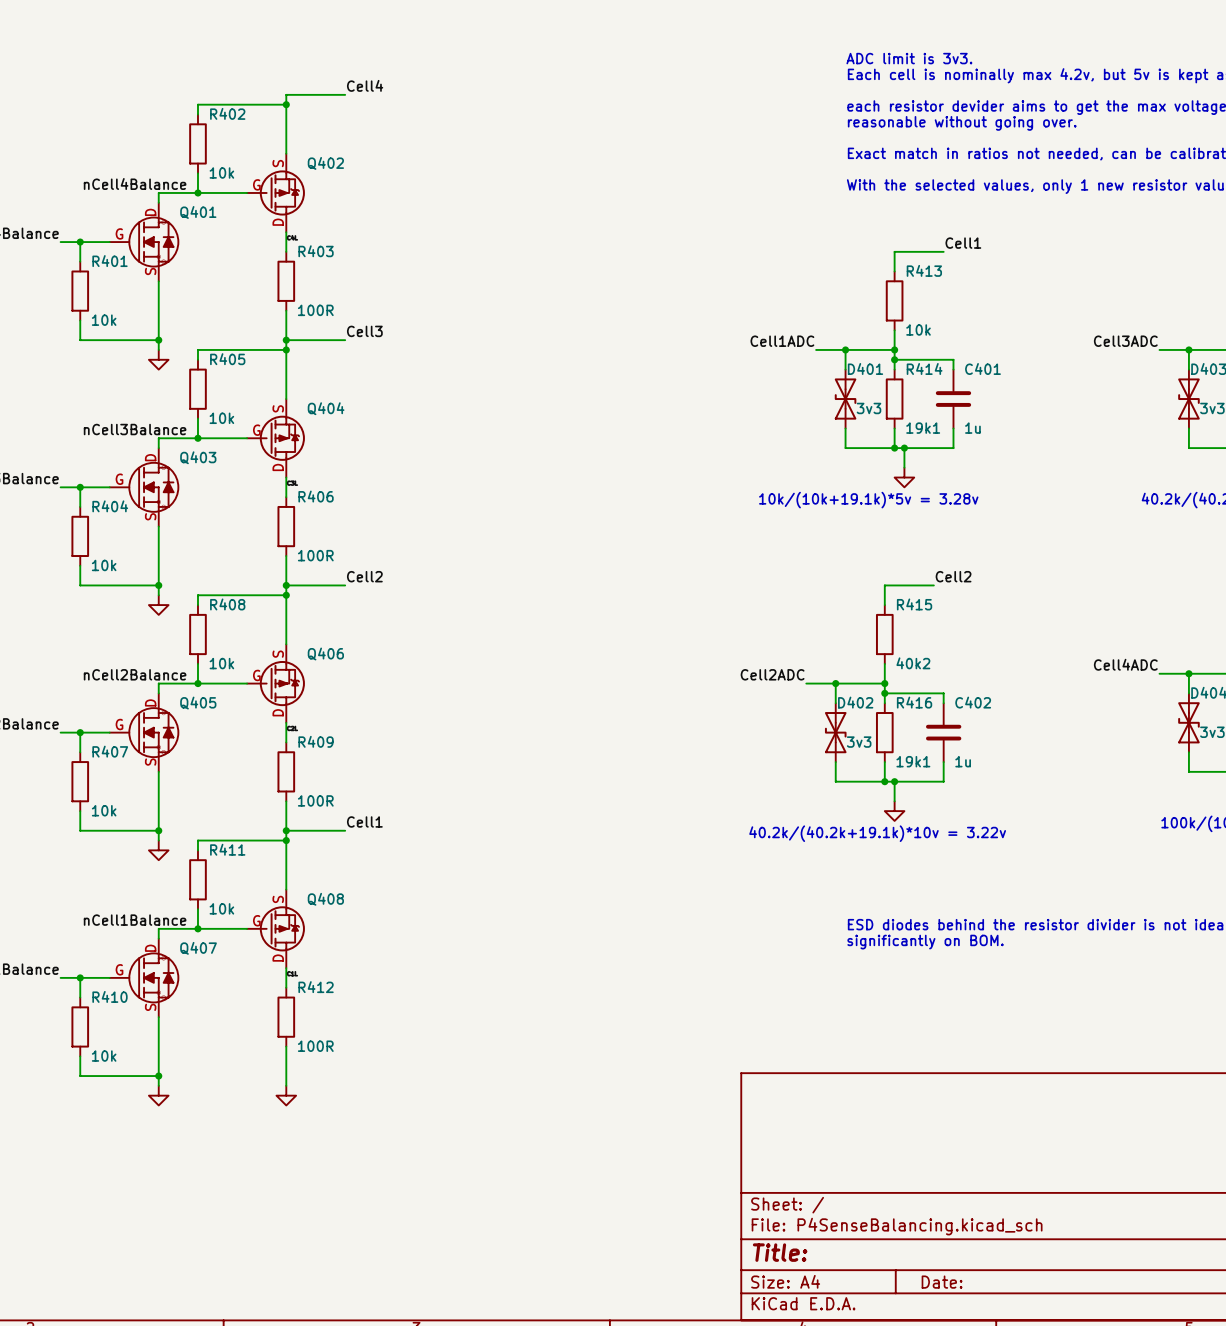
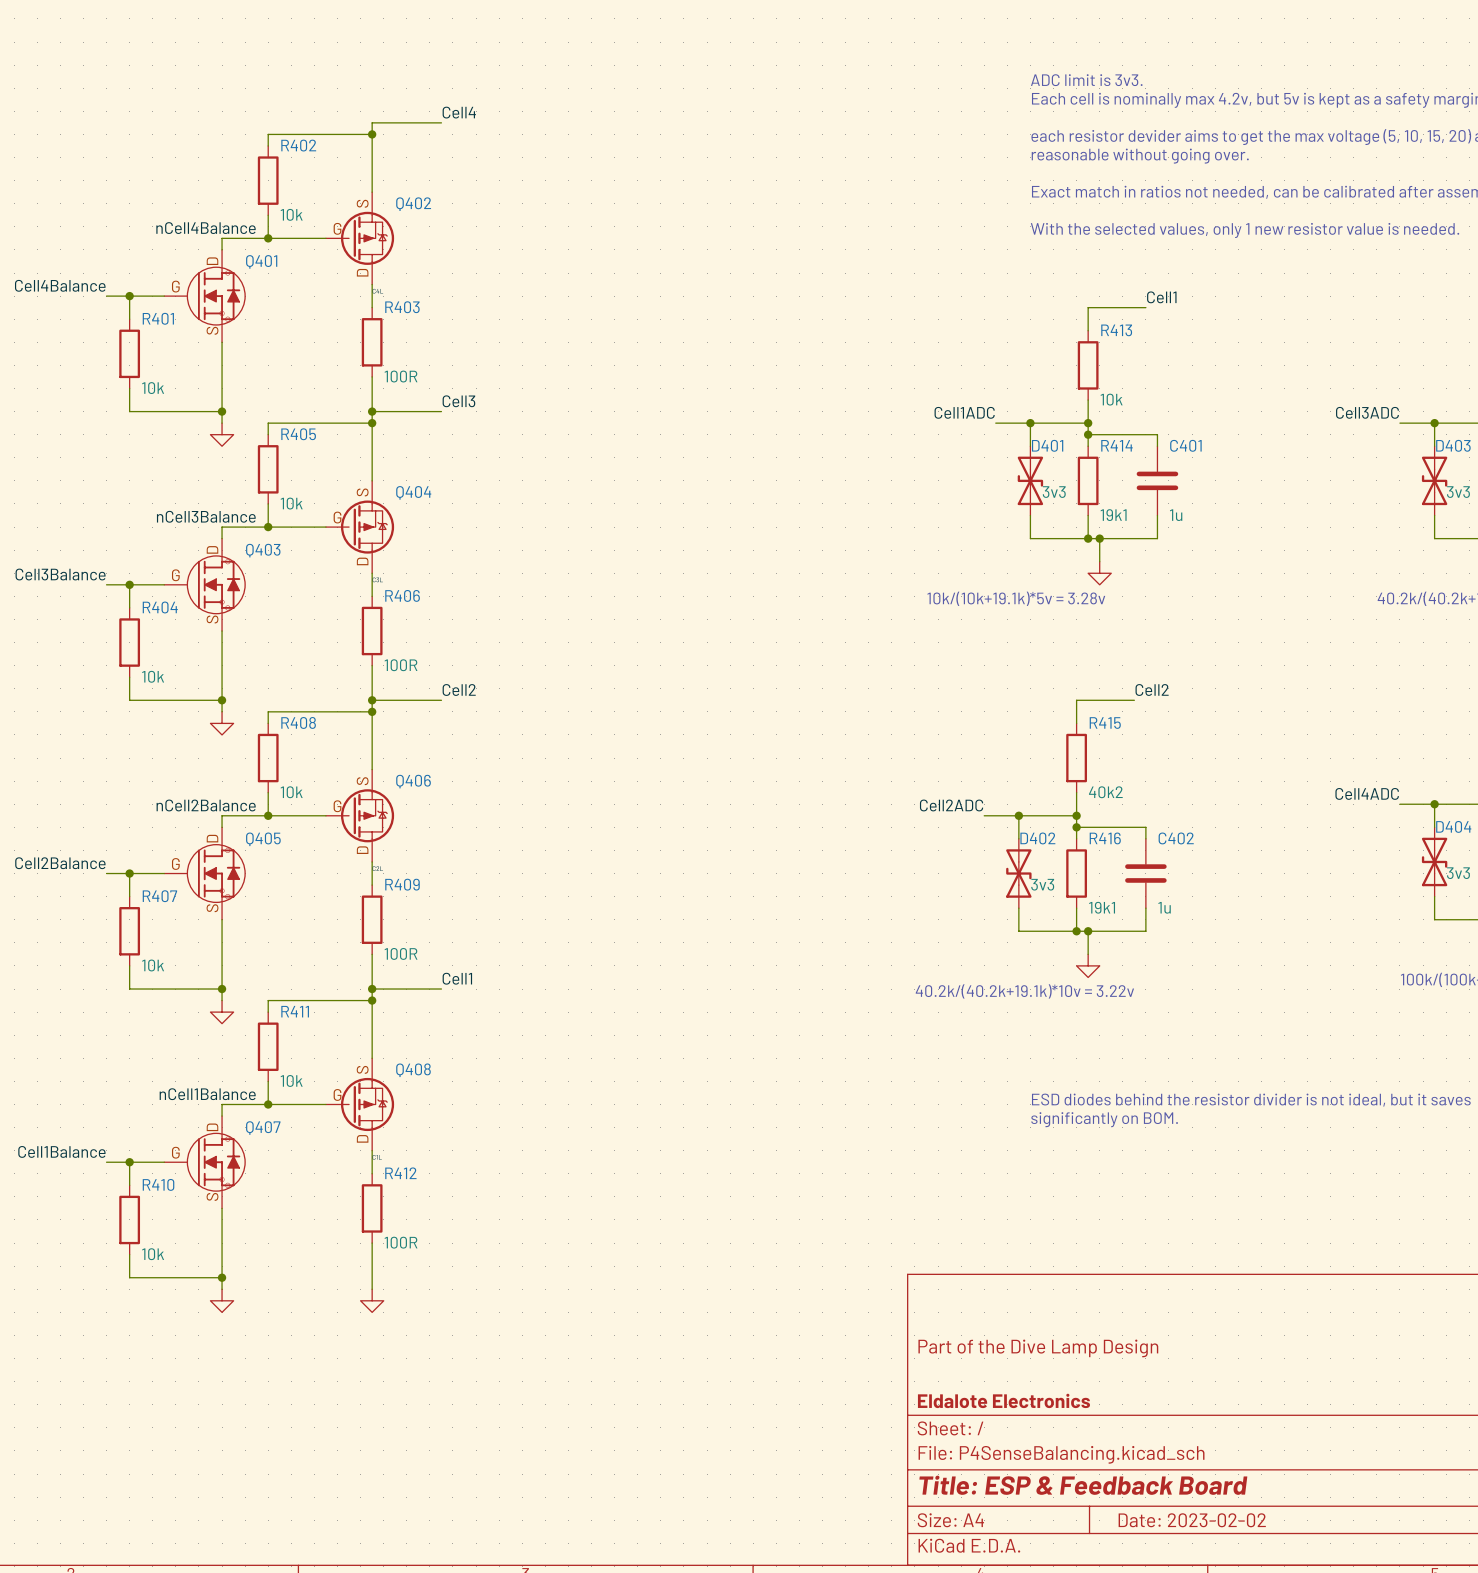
title block: none -> Part of the Dive Lamp Design (1038, 1348)
title block: none -> Eldalote Electronics (1003, 1400)
title block: Title: (780, 1252) -> Title: ESP & Feedback Board (1083, 1485)
title block: Date: (942, 1282) -> Date: 2023-02-02 (1192, 1520)

